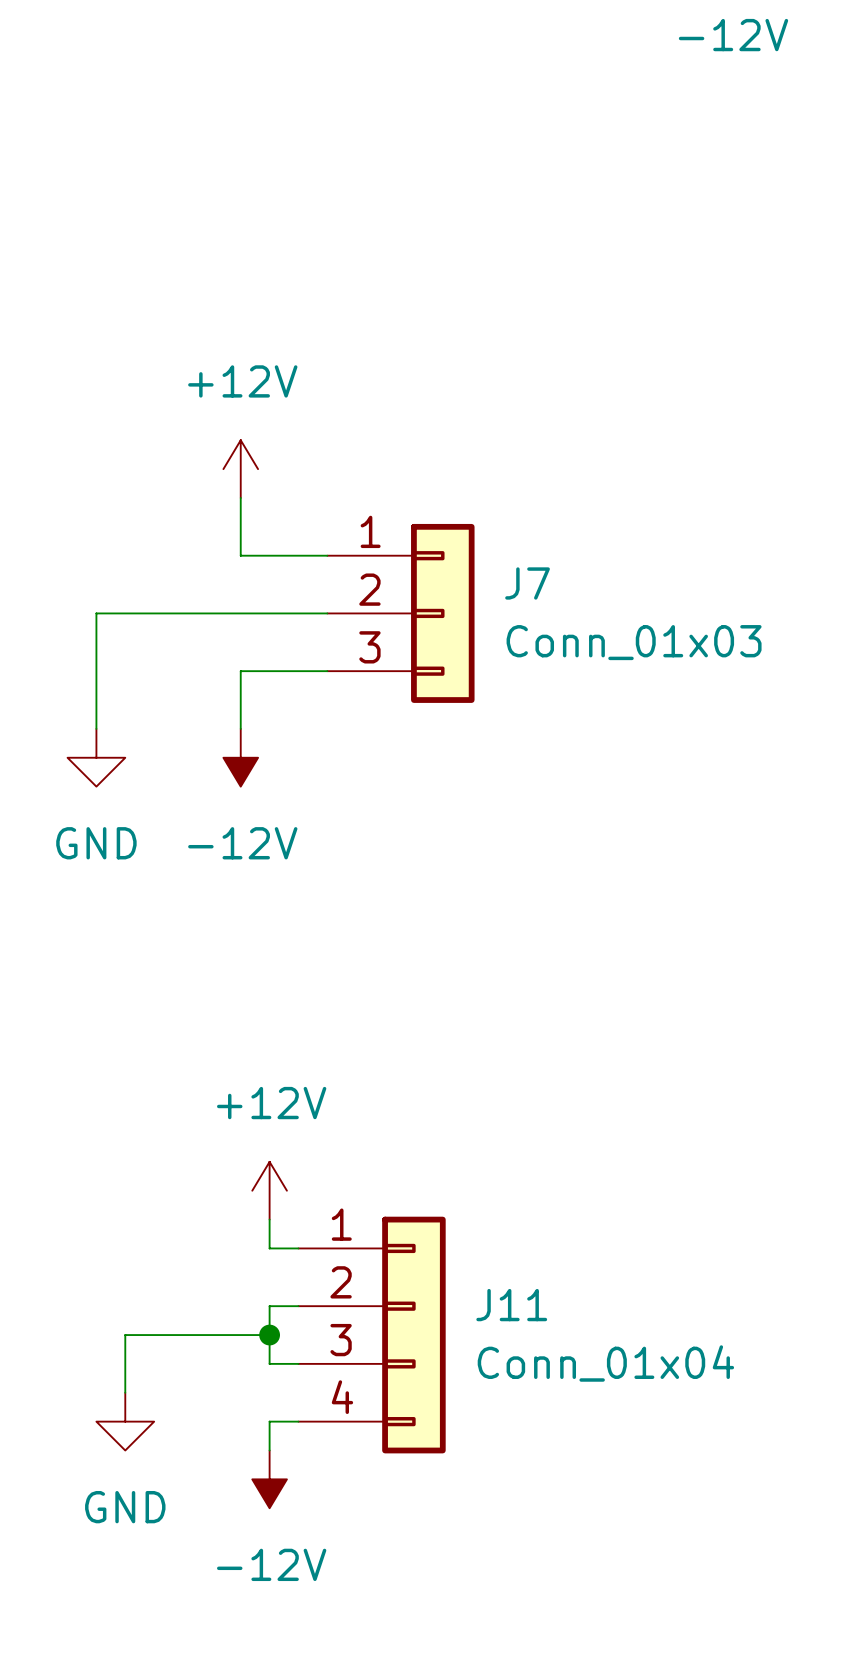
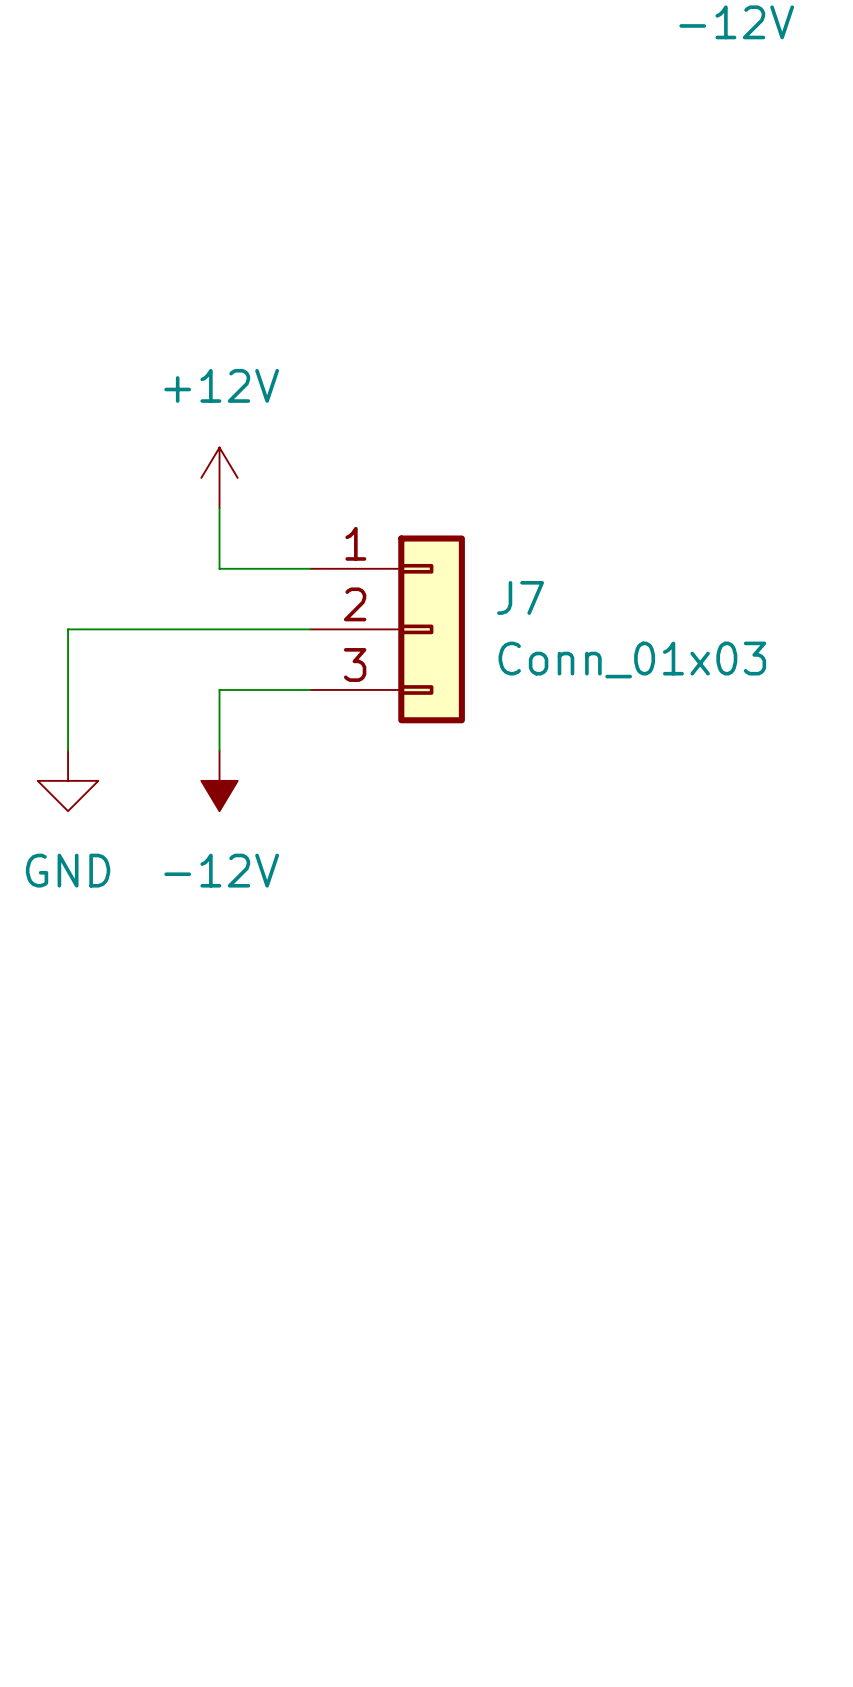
power symbol: +12V (269, 1190) -> none
wire: (269, 1219) (269, 1248) (298, 1248) -> none
wire: (298, 1306) (269, 1306) (269, 1363) (298, 1363) -> none
wire: (269, 1335) (125, 1335) (125, 1392) -> none
junction: (269, 1335) -> none
J11: Conn_01x04 (372, 1335) -> none
power symbol: GND (125, 1421) -> none
wire: (298, 1421) (269, 1421) (269, 1450) -> none
power symbol: -12V (269, 1479) -> none

